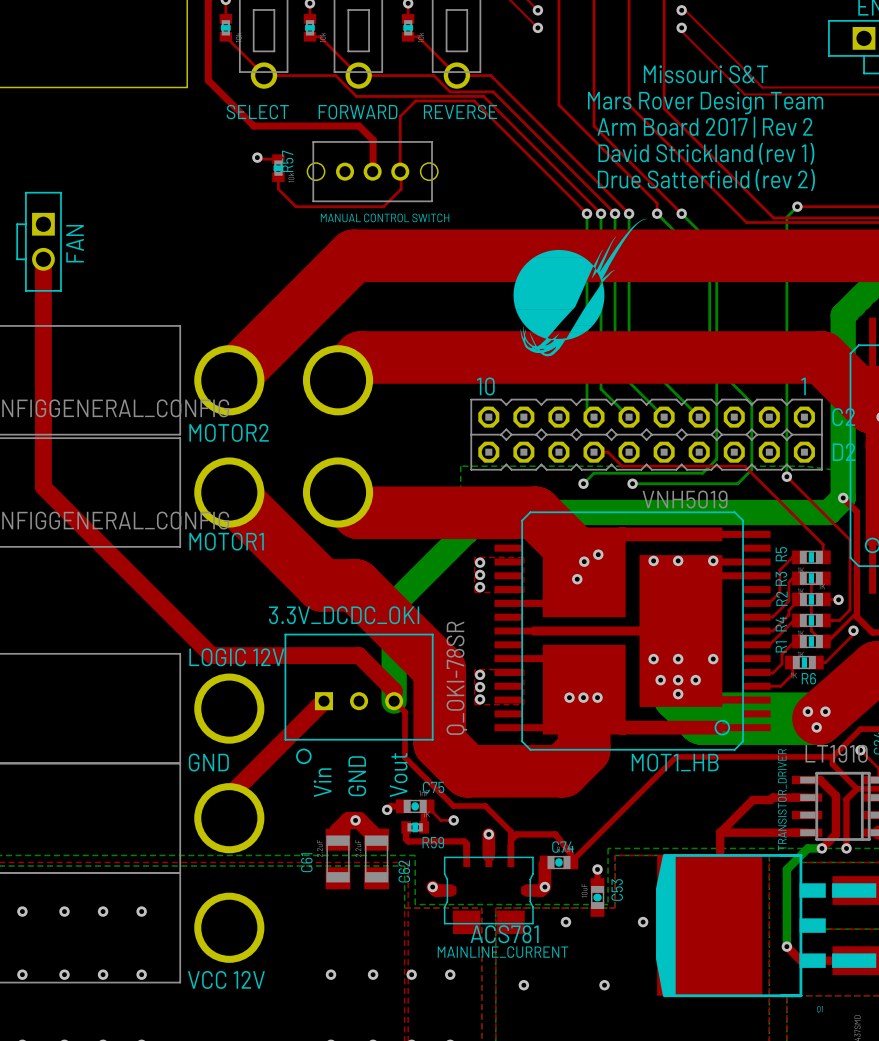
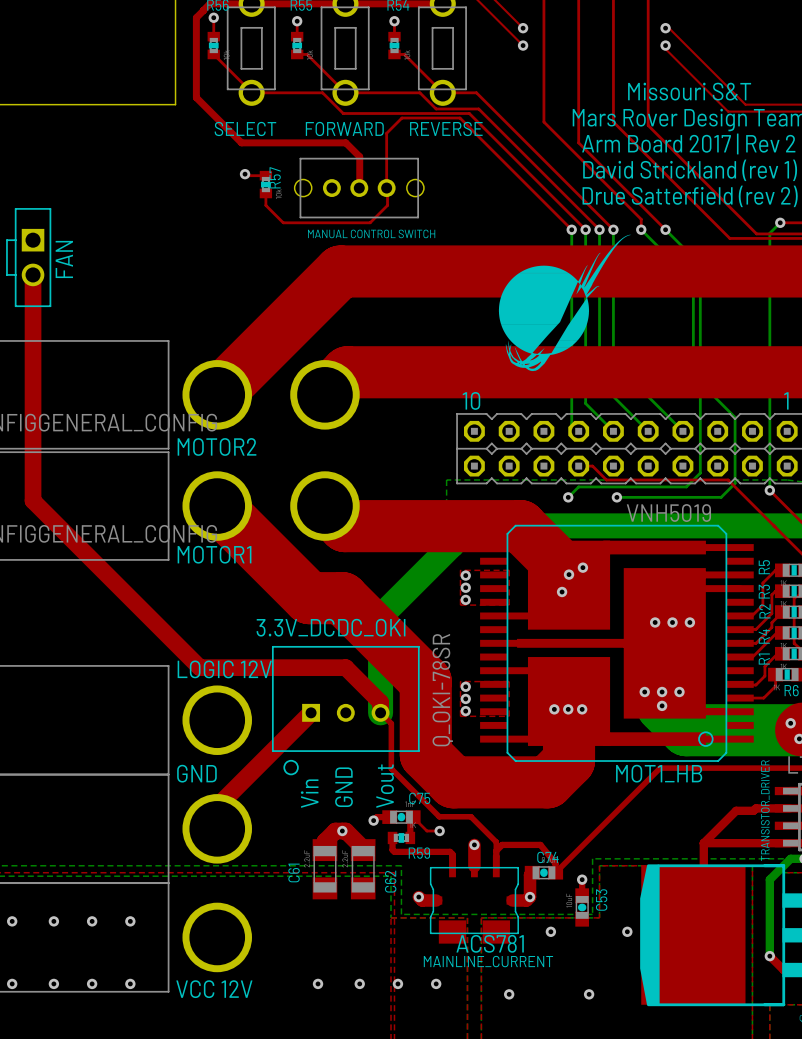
via: (653, 560) -> none
via: (678, 560) -> none
via: (713, 560) -> none
via: none -> (655, 622)
via: none -> (672, 622)
via: none -> (689, 622)
via: (653, 659) -> none
via: (678, 659) -> none
via: (713, 659) -> none

